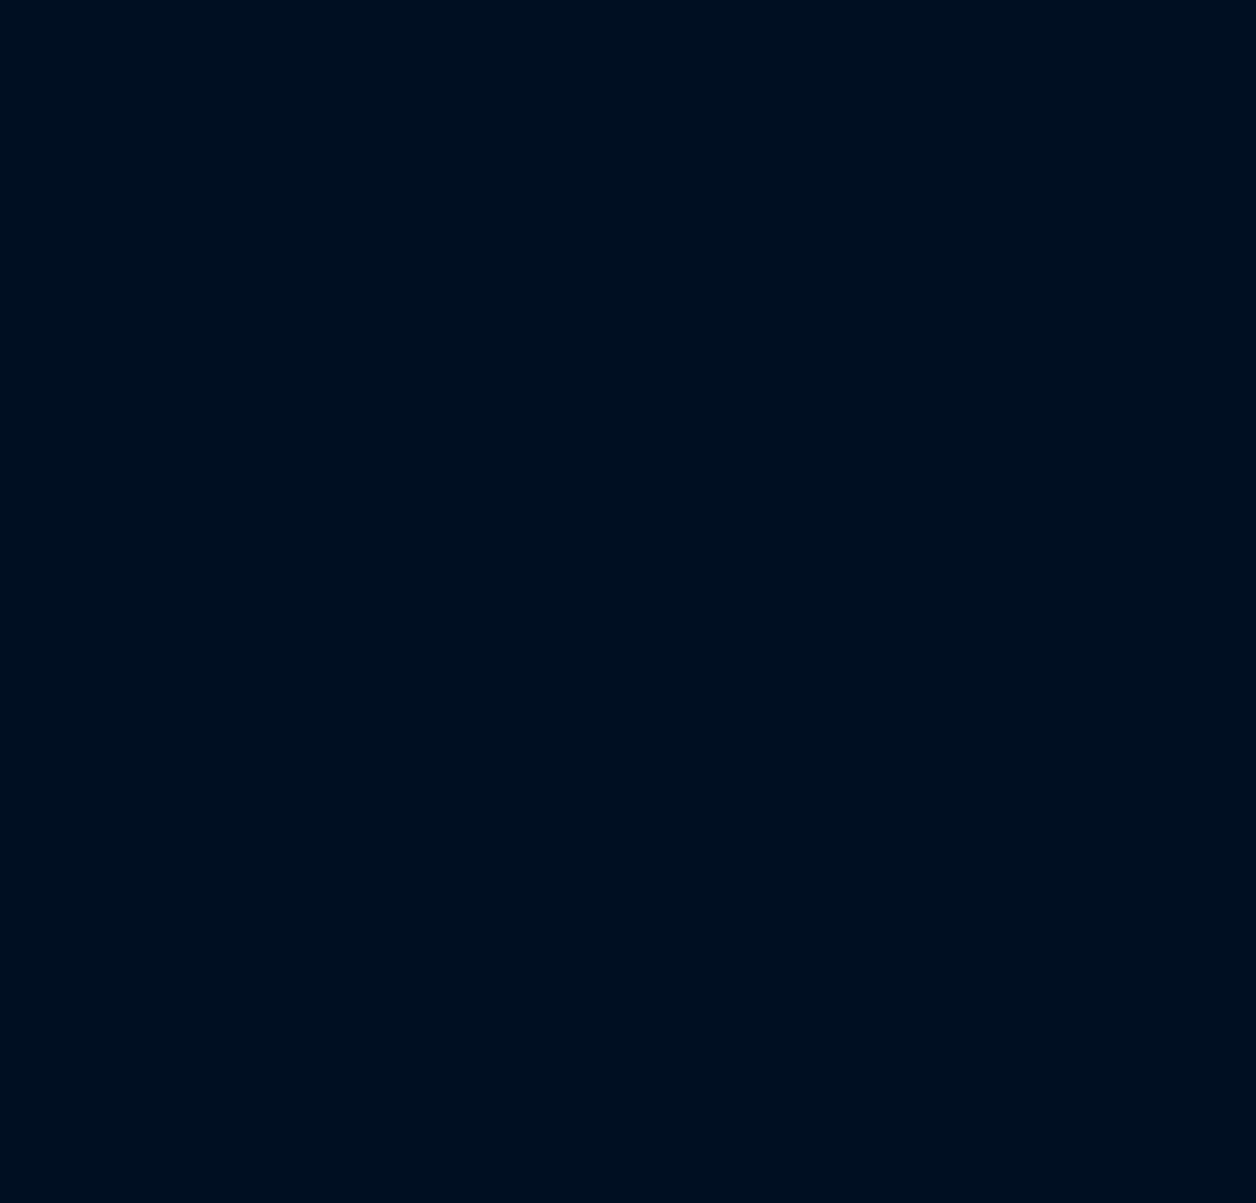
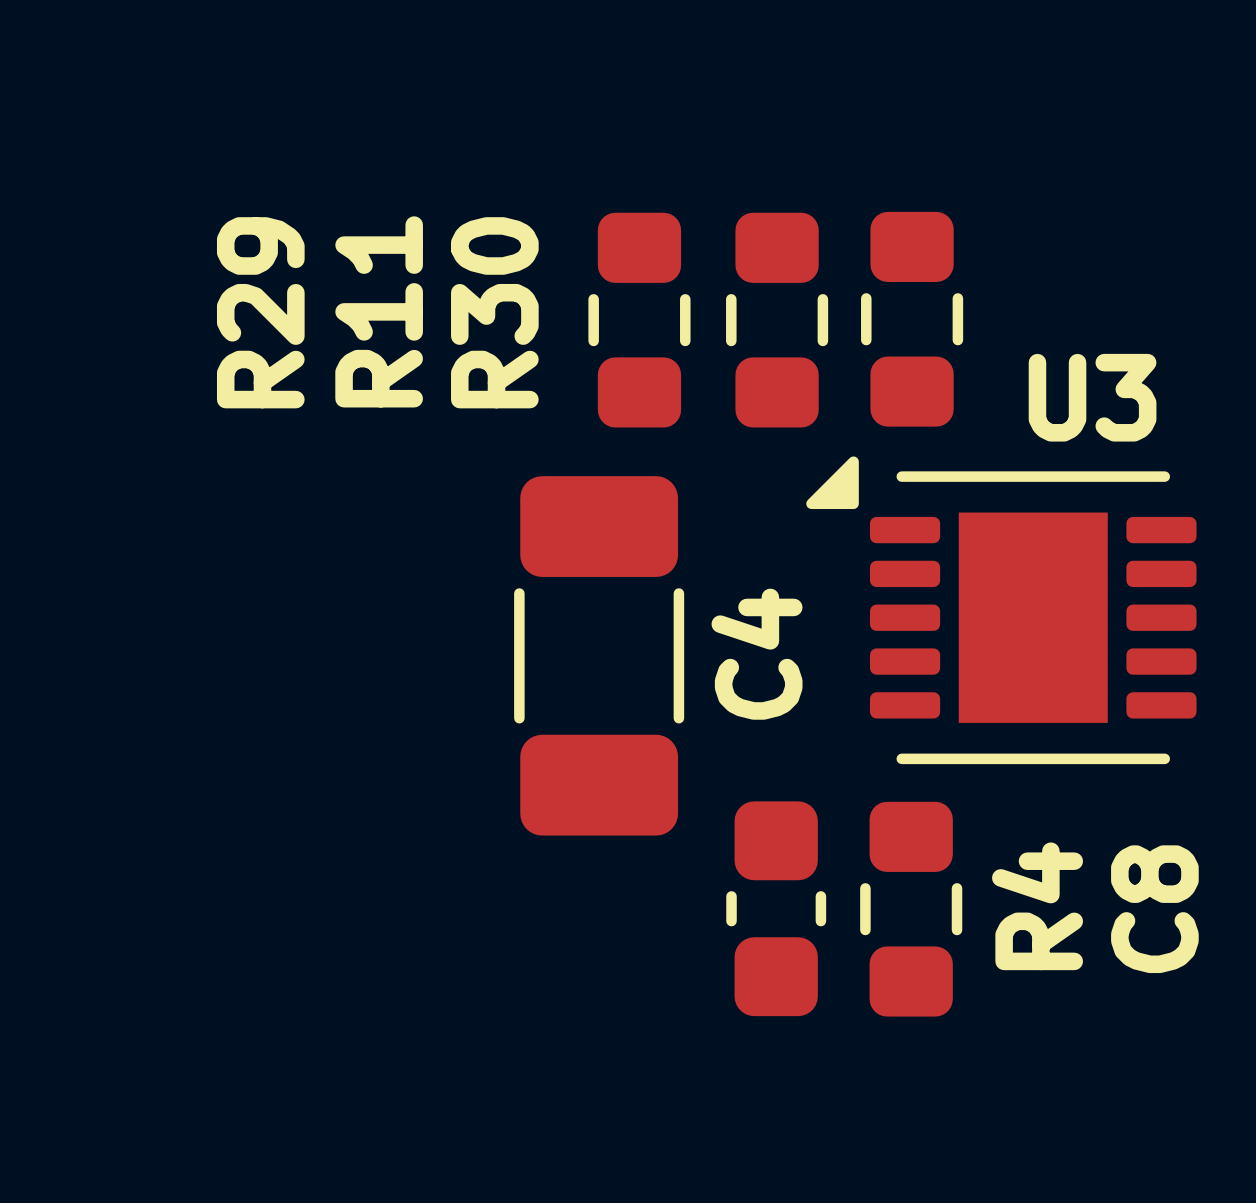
R11: none -> (912, 319)
R29: none -> (639, 320)
R30: none -> (777, 320)
U3: none -> (1001, 610)
C4: none -> (599, 655)
C8: none -> (776, 908)
R4: none -> (911, 909)

